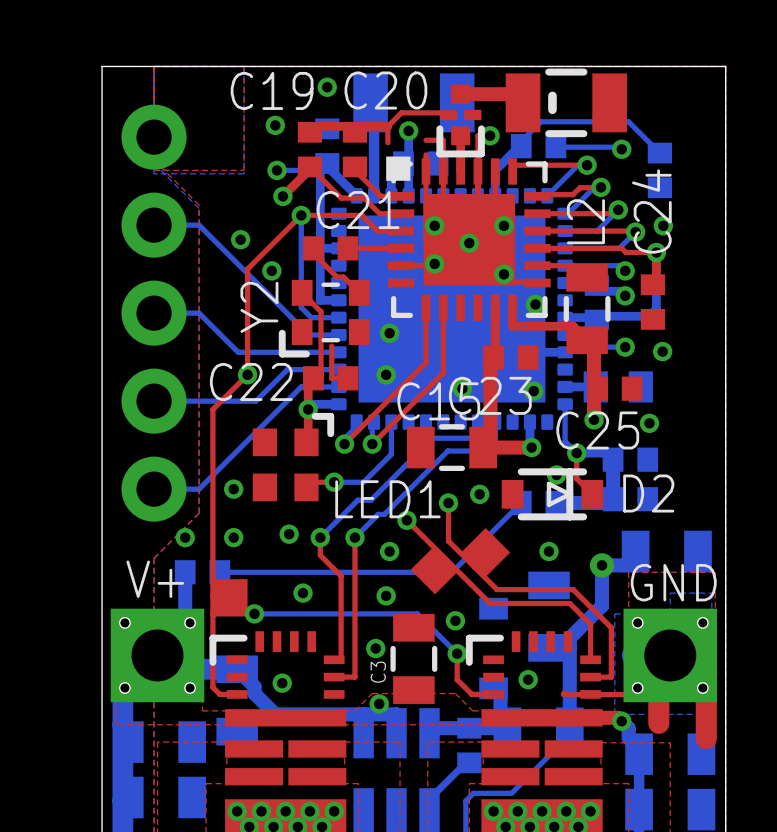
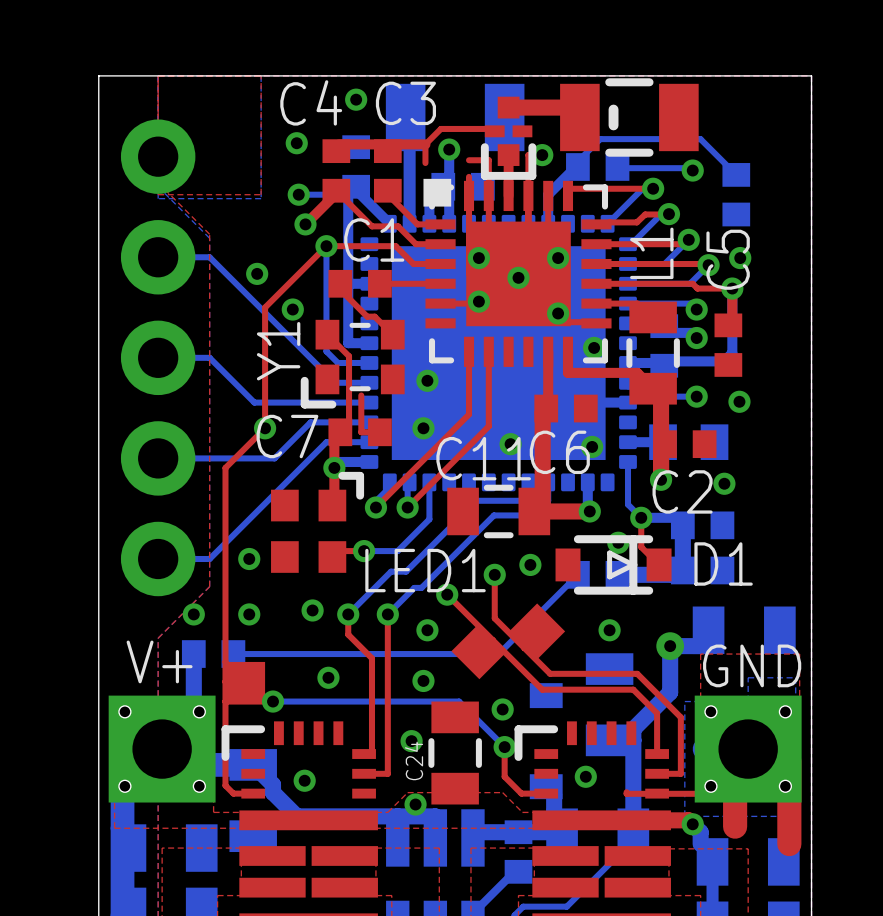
C19 name: C19 (272, 90) -> C4 (311, 102)
C20 name: C20 (385, 90) -> C3 (405, 103)
C21 name: C21 (358, 210) -> C1 (374, 239)
C24 name: C24 (651, 211) -> C5 (728, 259)
L2 name: L2 (585, 221) -> L1 (651, 253)
Y2 name: Y2 (259, 307) -> Y1 (278, 351)
C22 name: C22 (251, 381) -> C7 (287, 436)
C23 name: C23 (490, 395) -> C6 (559, 452)
C15 name: C15 (438, 401) -> C11 (483, 458)
C25 name: C25 (597, 430) -> C2 (682, 491)
D2 name: D2 (648, 493) -> D1 (723, 563)
C3 name: C3 (378, 672) -> C24 (414, 760)

